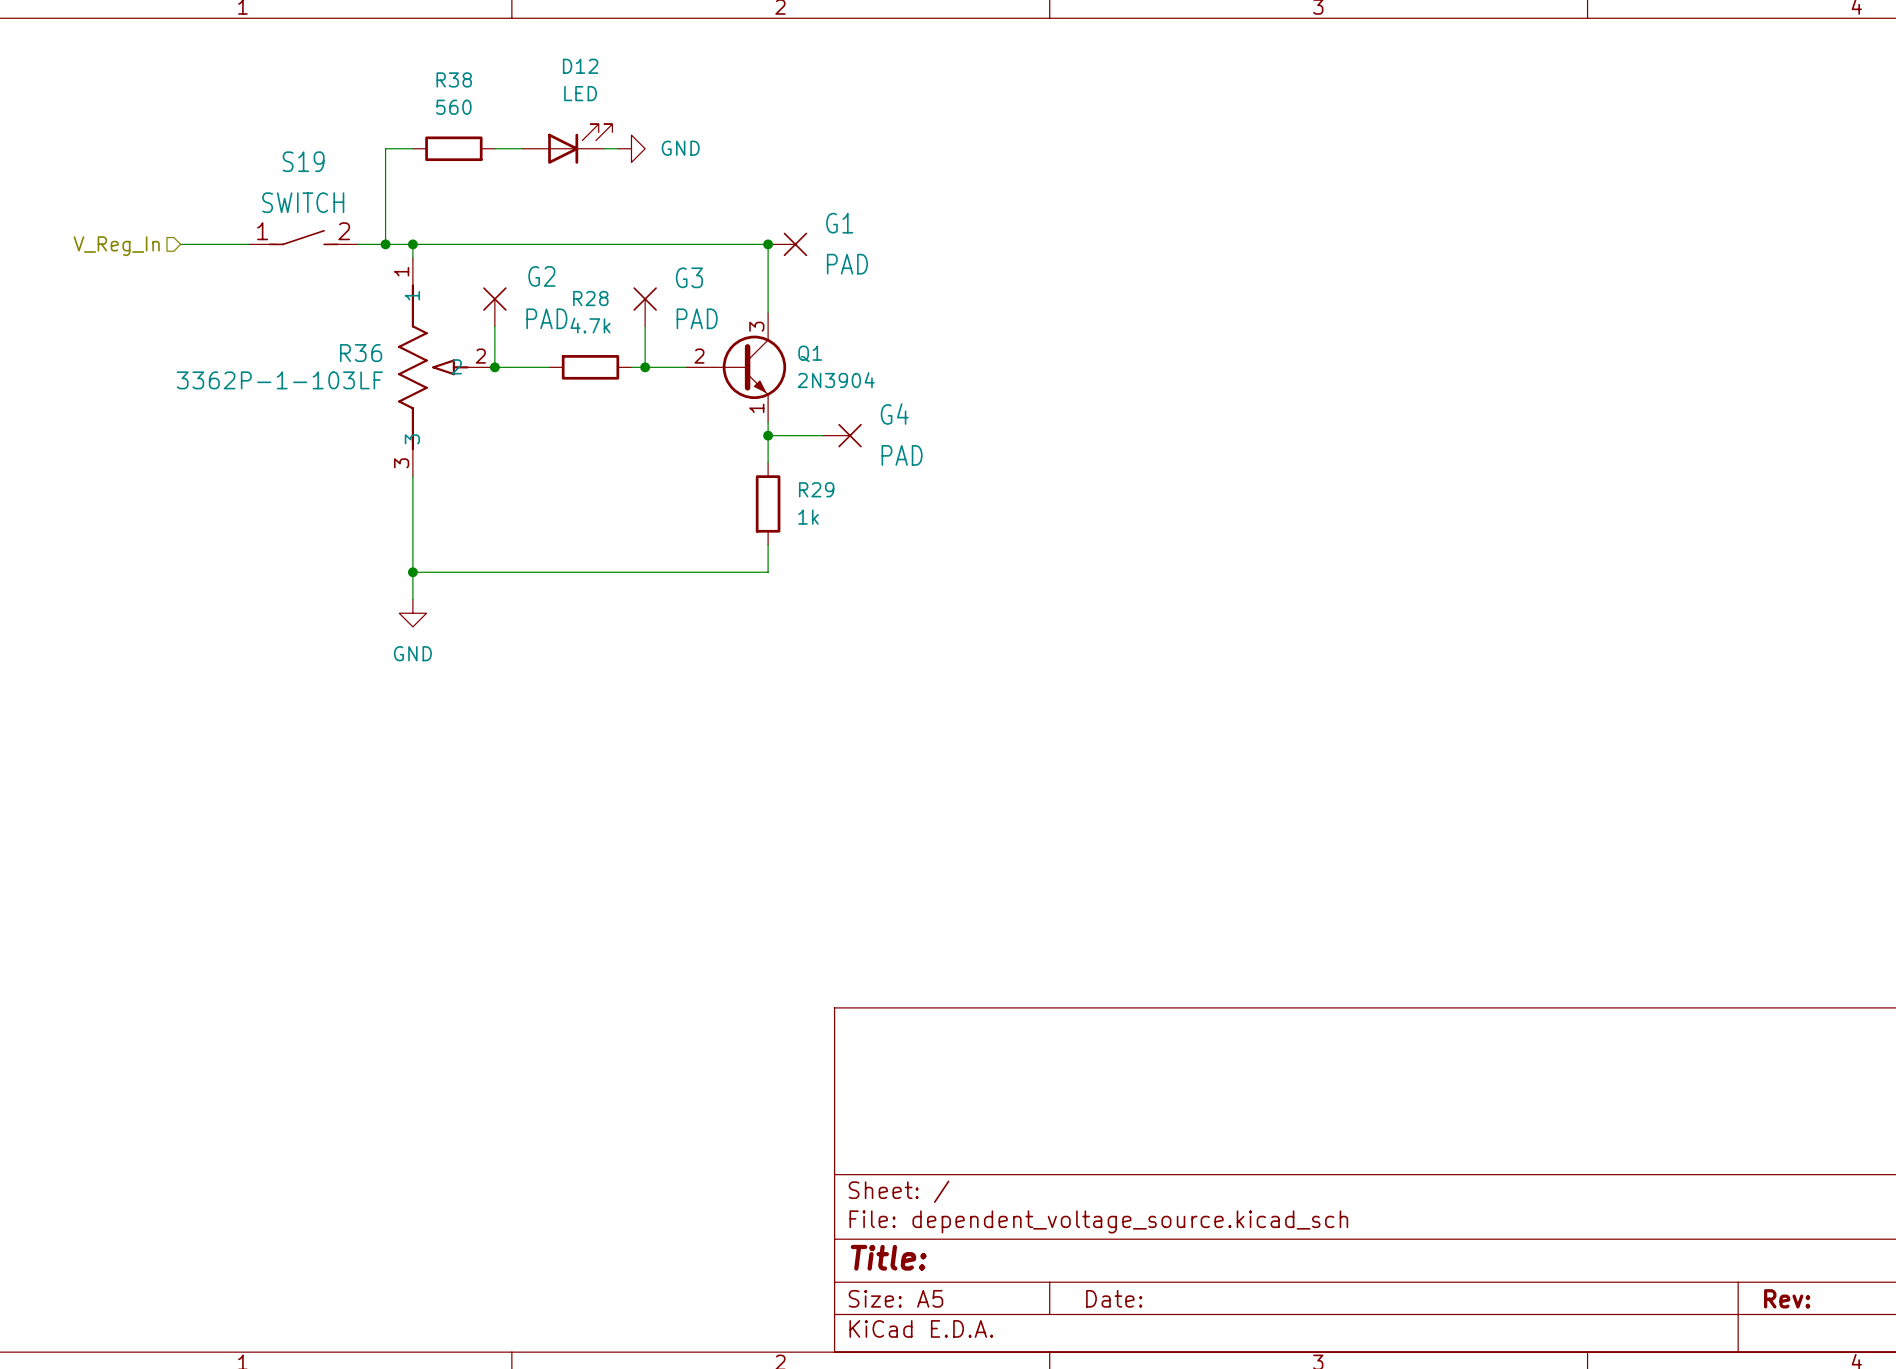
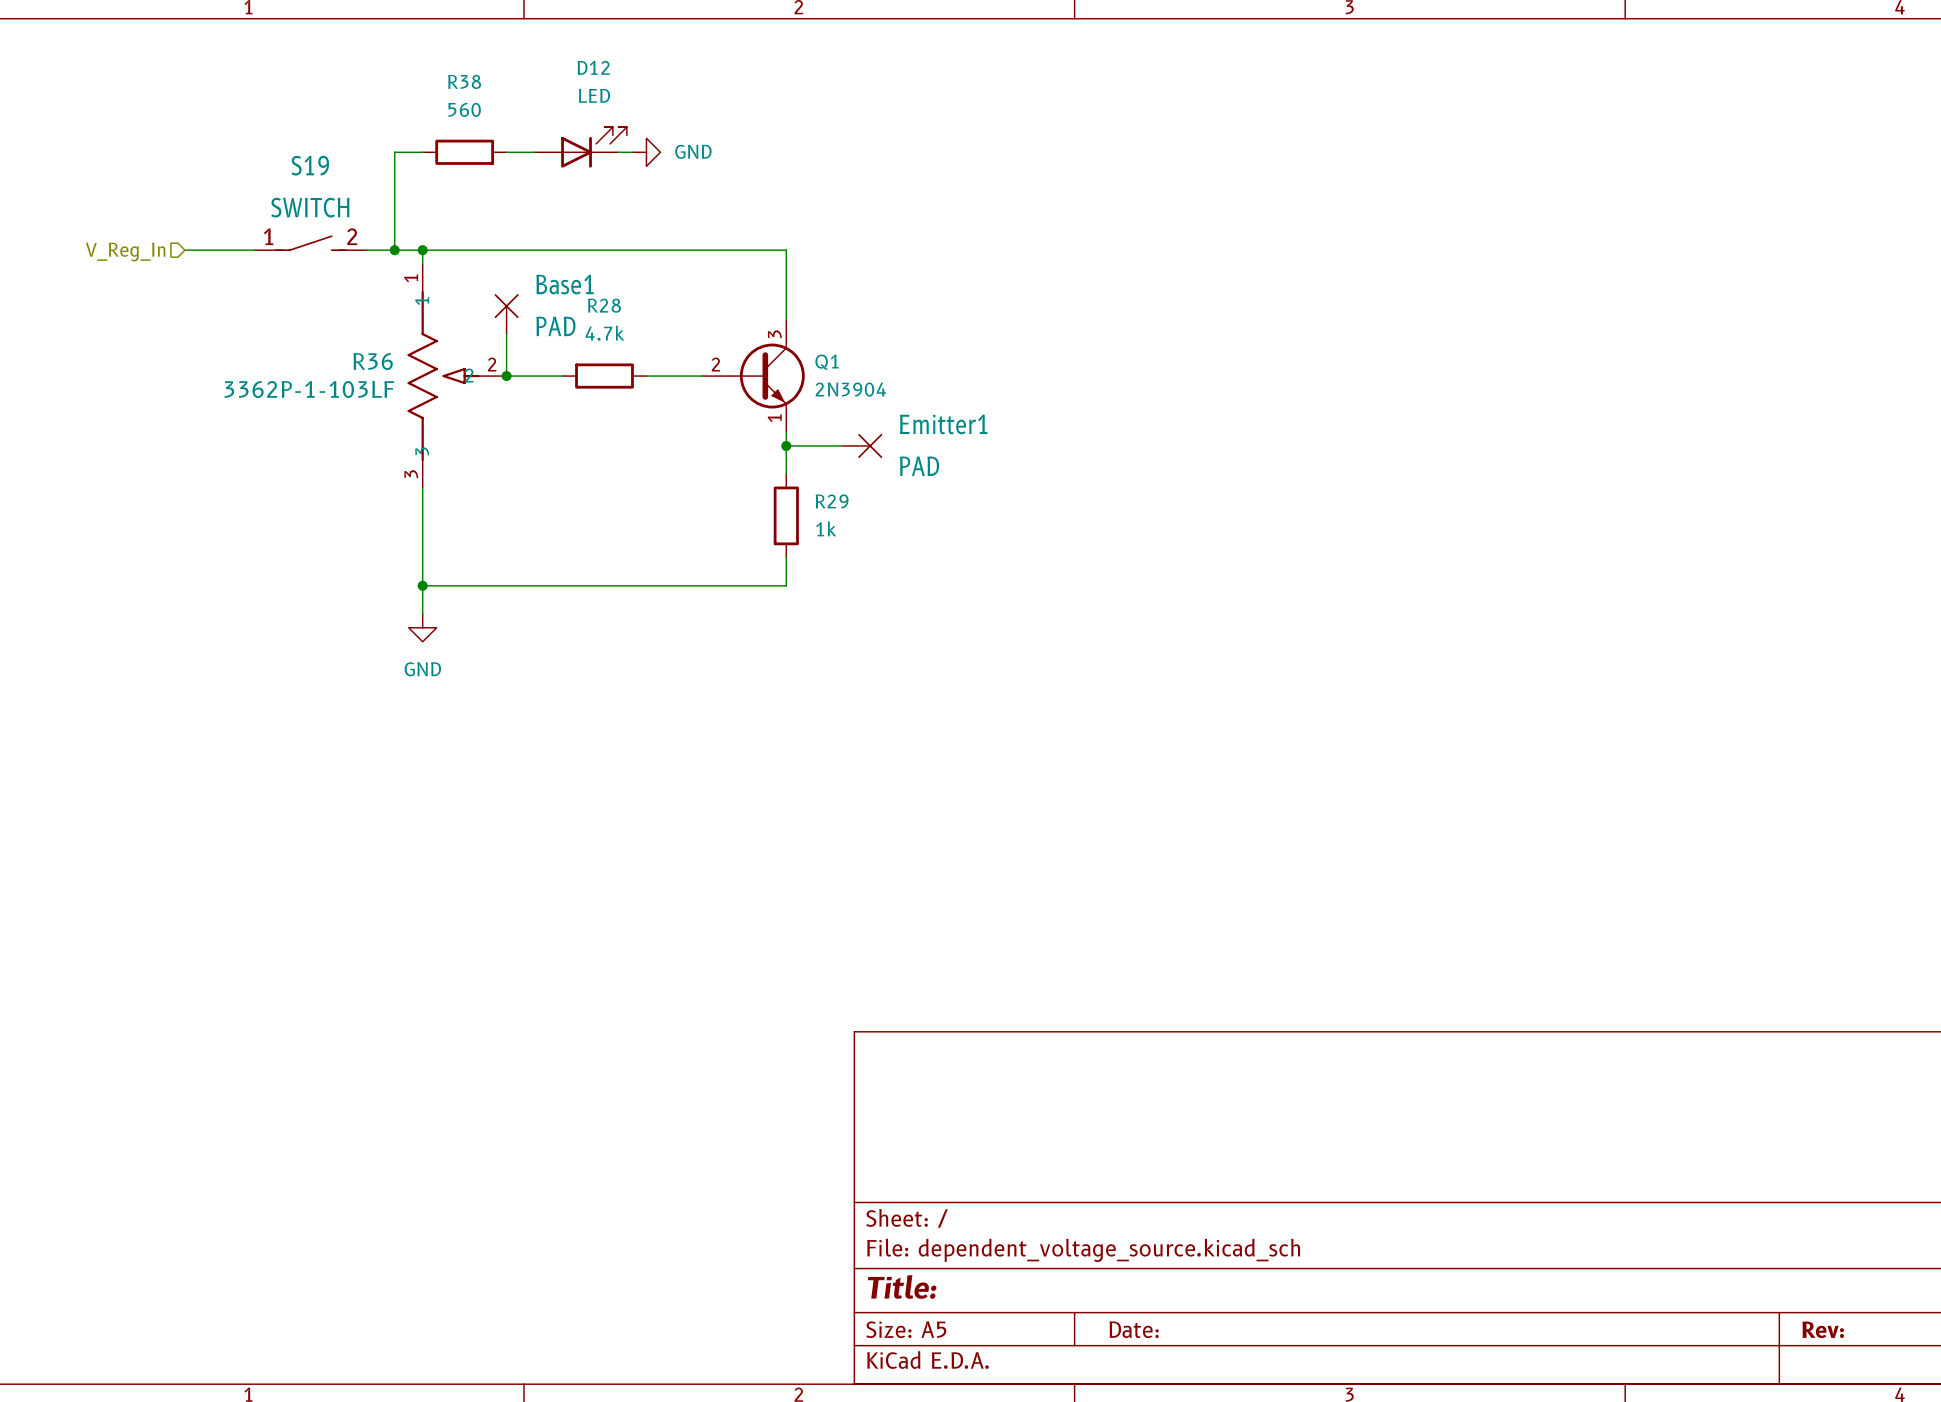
junction: (768, 244) -> none
G1: PAD (787, 244) -> none
G2 name: G2 (541, 276) -> Base1 (565, 284)
G3: PAD (645, 306) -> none
wire: (645, 326) (645, 367) -> none
junction: (645, 367) -> none
G4 name: G4 (894, 413) -> Emitter1 (943, 424)

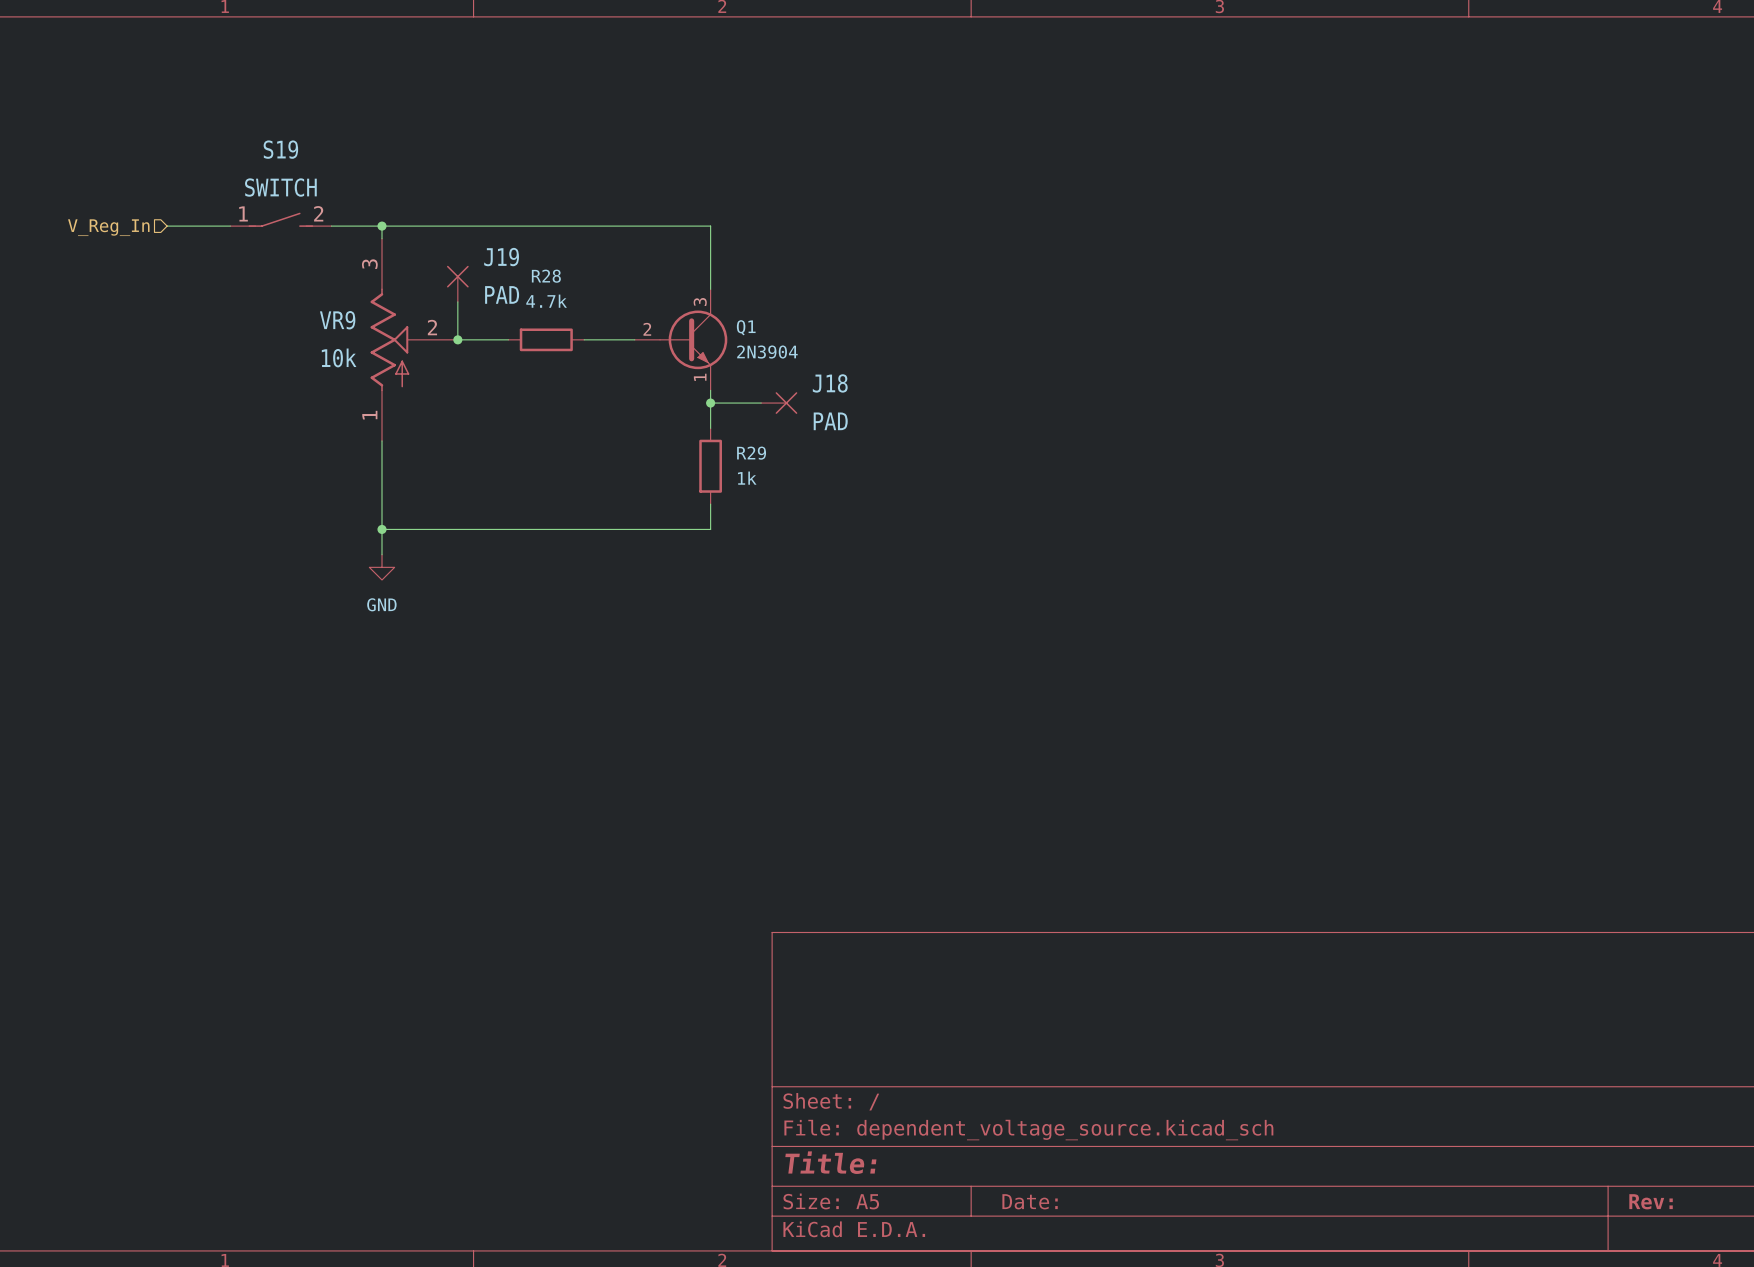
D12: LED (580, 147) -> none
wire: (422, 152) (394, 152) (394, 250) -> none
R38: 560 (464, 152) -> none
wire: (506, 152) (534, 152) -> none
wire: (618, 152) (632, 152) -> none
power symbol: GND (646, 152) -> none
junction: (394, 250) -> none
Base1 name: Base1 (565, 284) -> J19 (501, 257)
R36: 3362P-1-103LF (457, 376) -> none
VR9: none -> 10k (414, 339)
Emitter1 name: Emitter1 (943, 424) -> J18 (830, 383)

